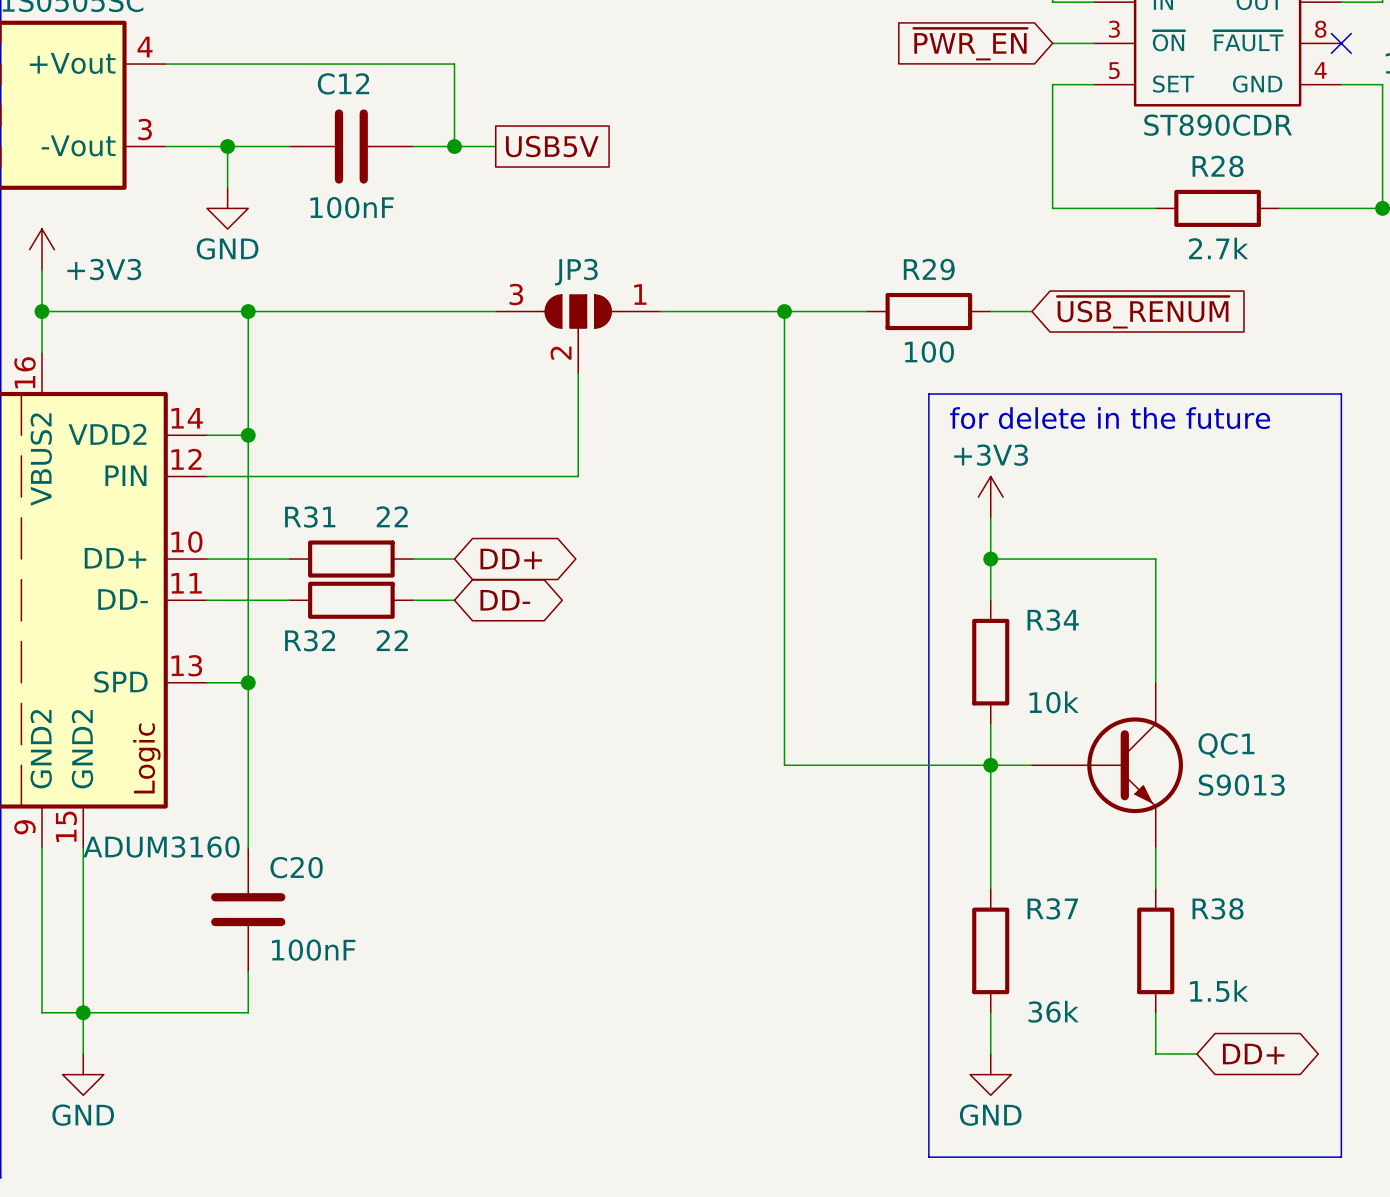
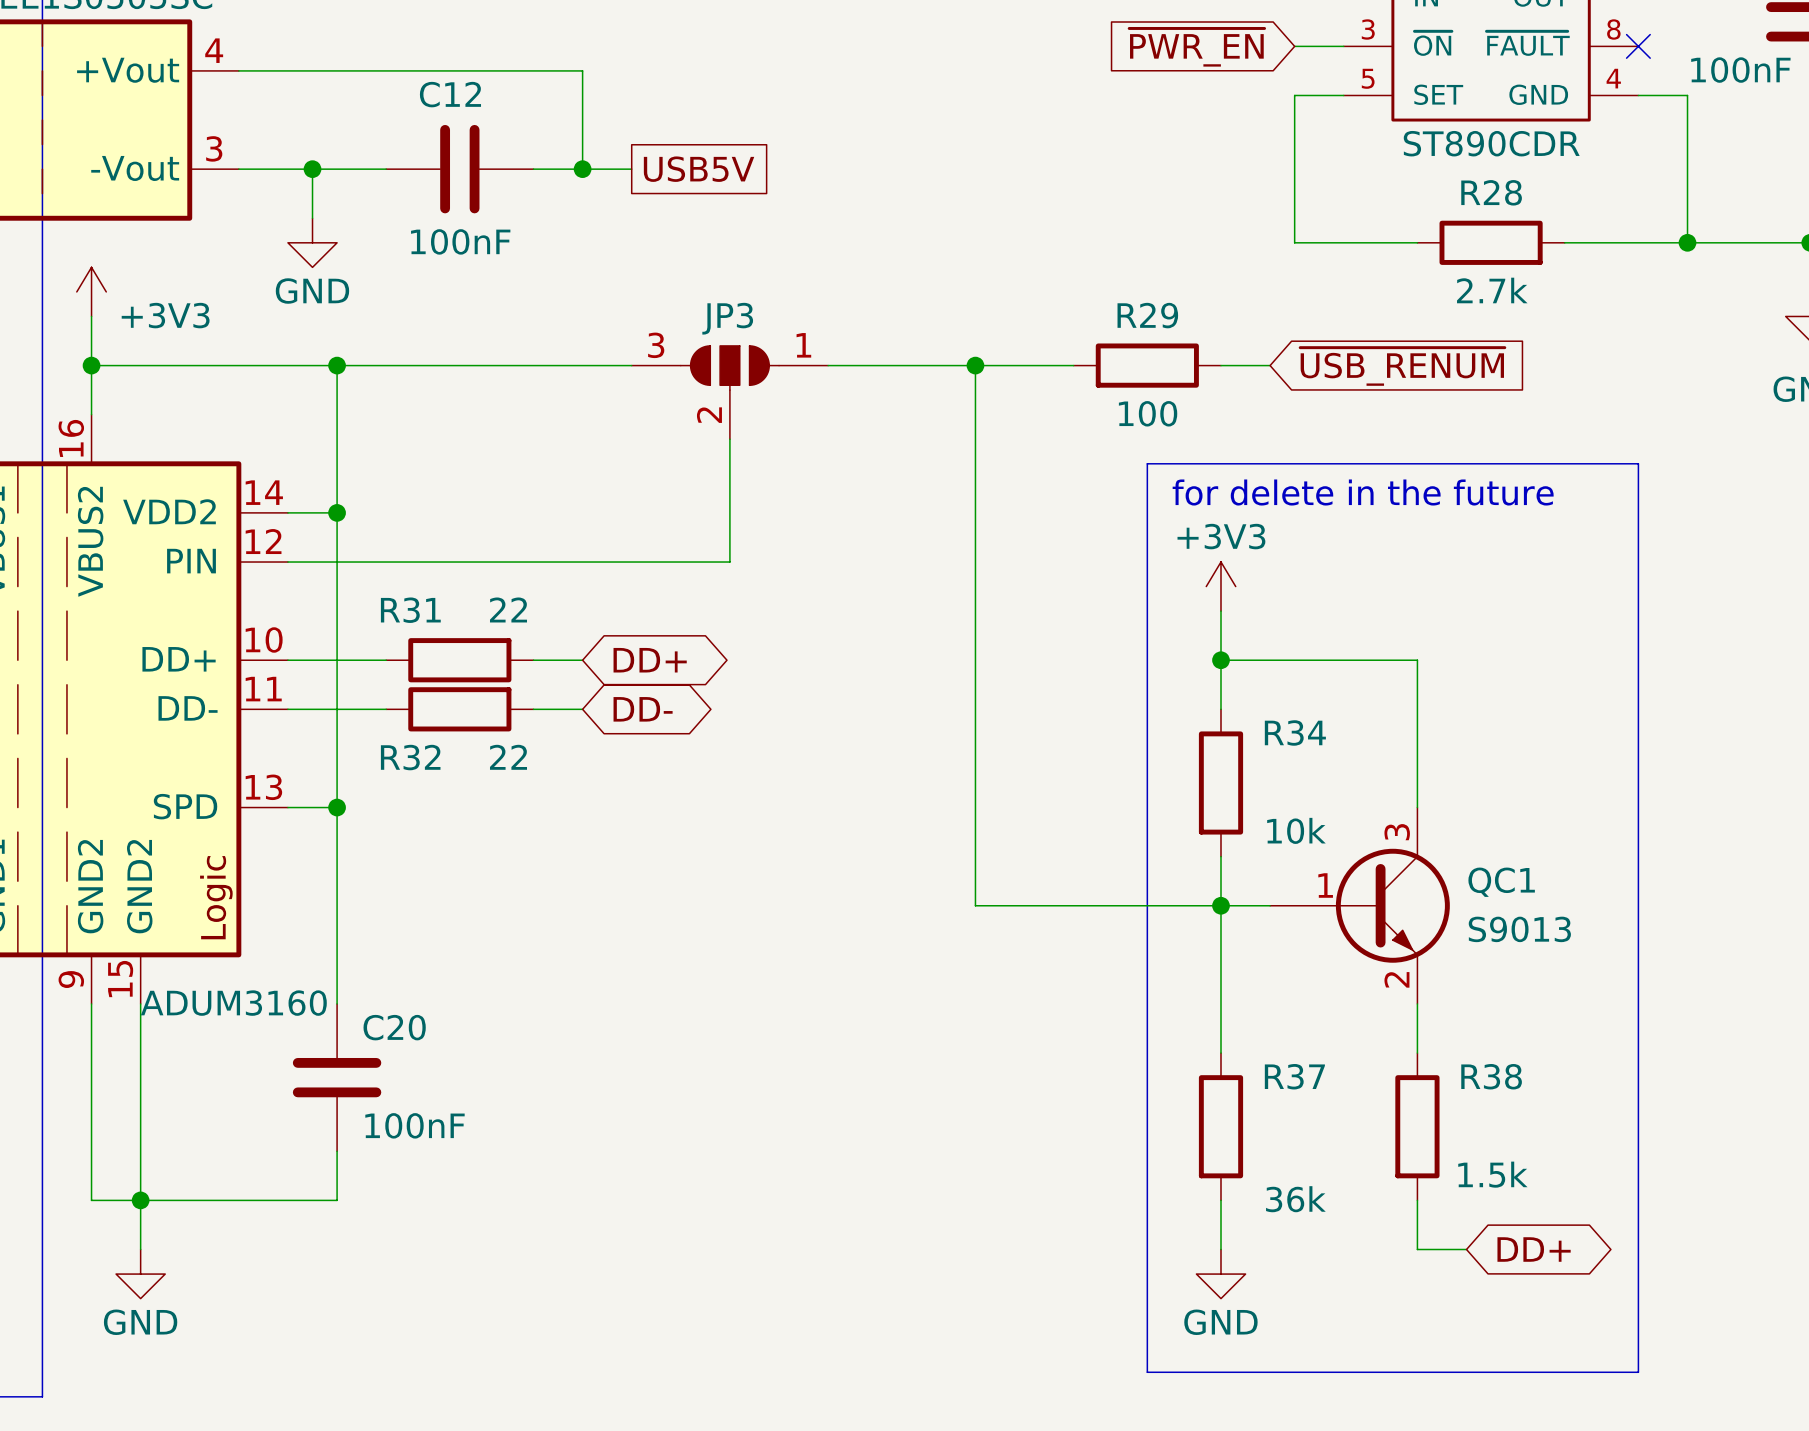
QC1 pin number: none -> 3 (1397, 832)
QC1 pin number: none -> 1 (1325, 885)
QC1 pin number: none -> 2 (1396, 979)

